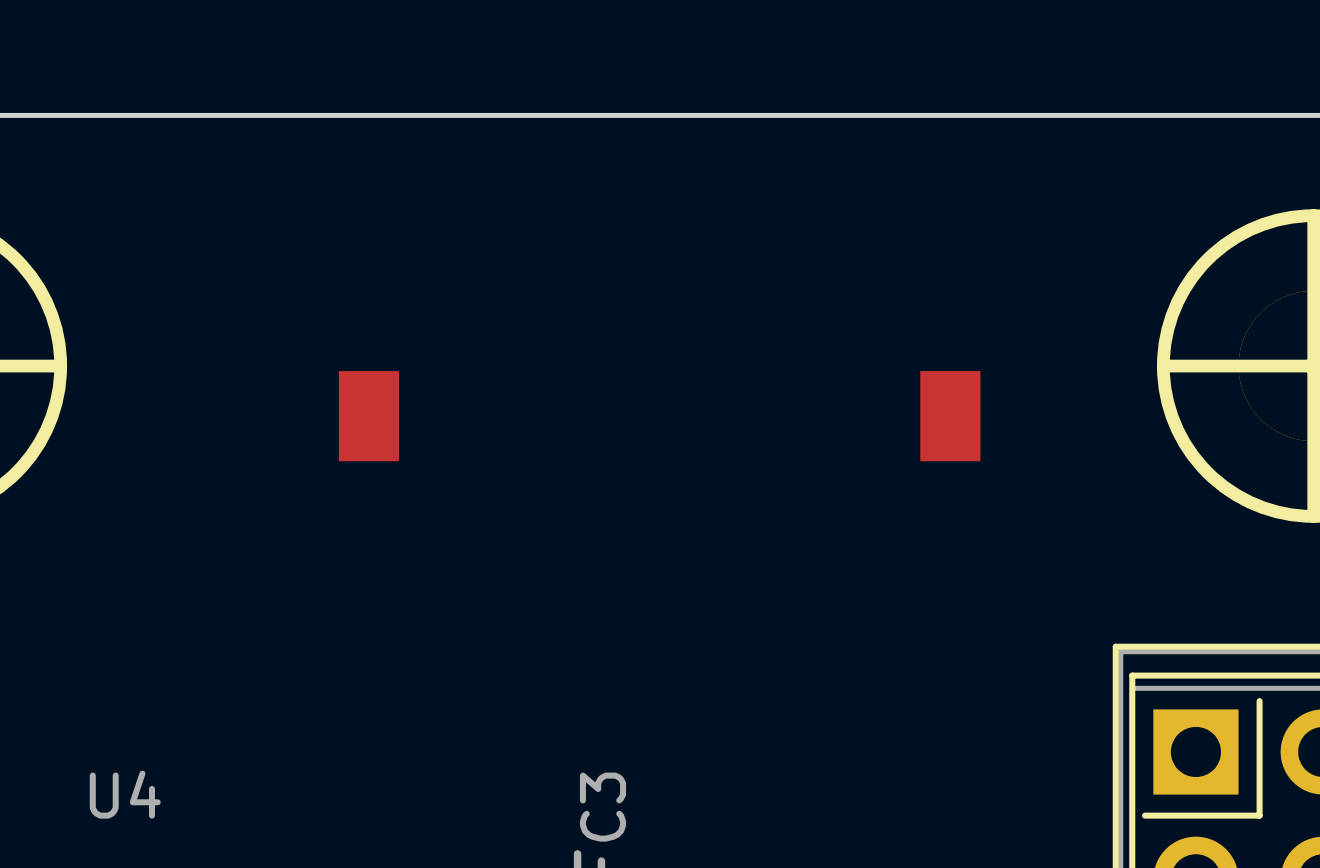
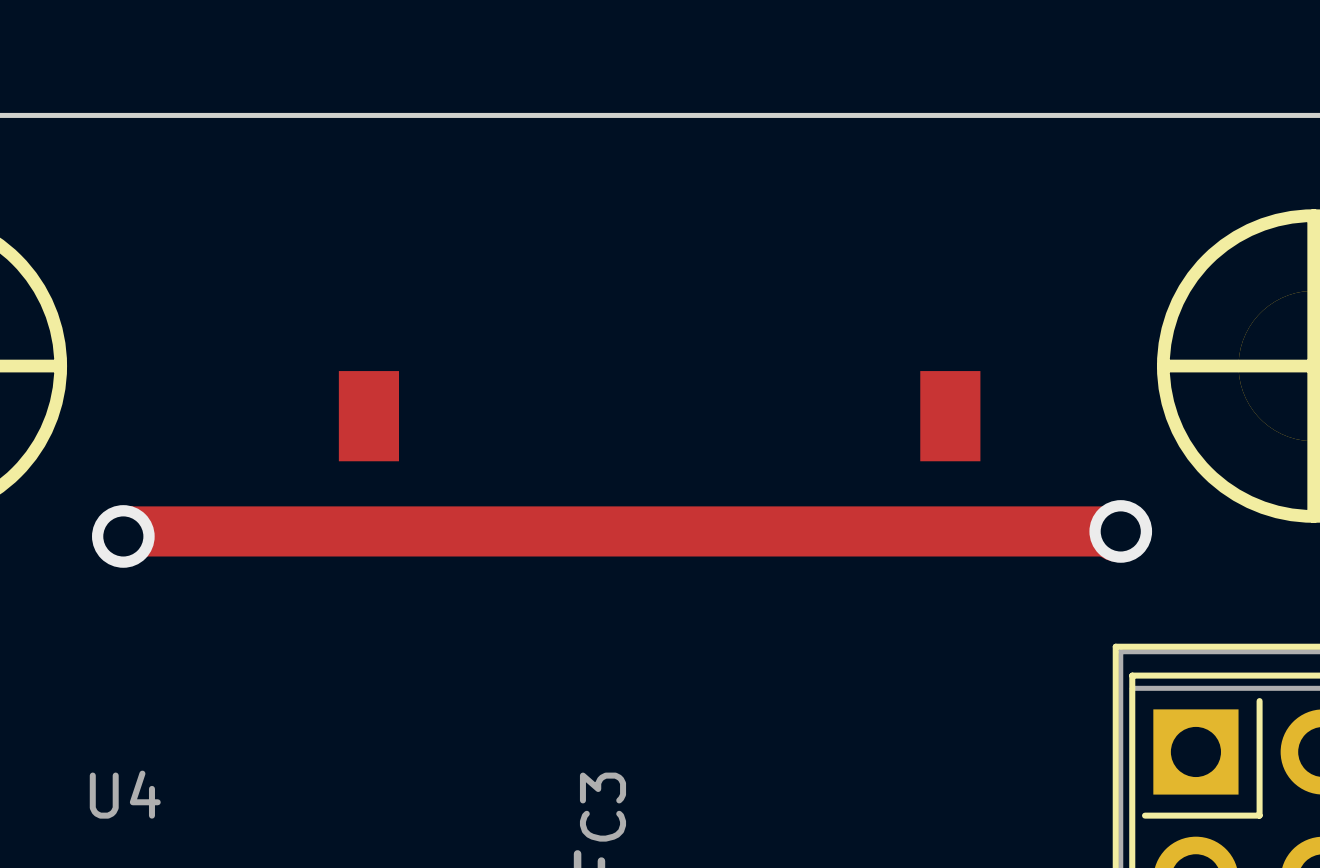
via: none -> (1120, 531)
track: none -> (123, 536) (128, 531) (1120, 531) (1115, 536)
via: none -> (123, 536)

